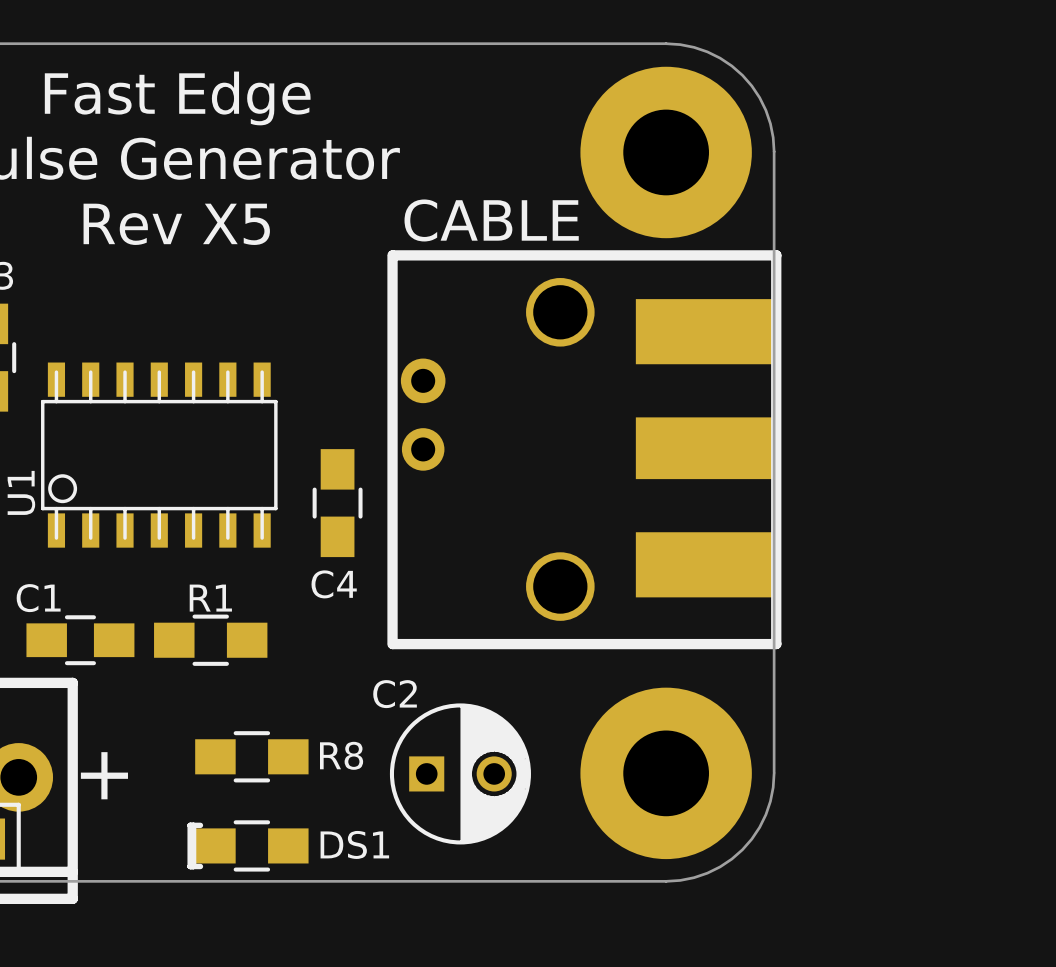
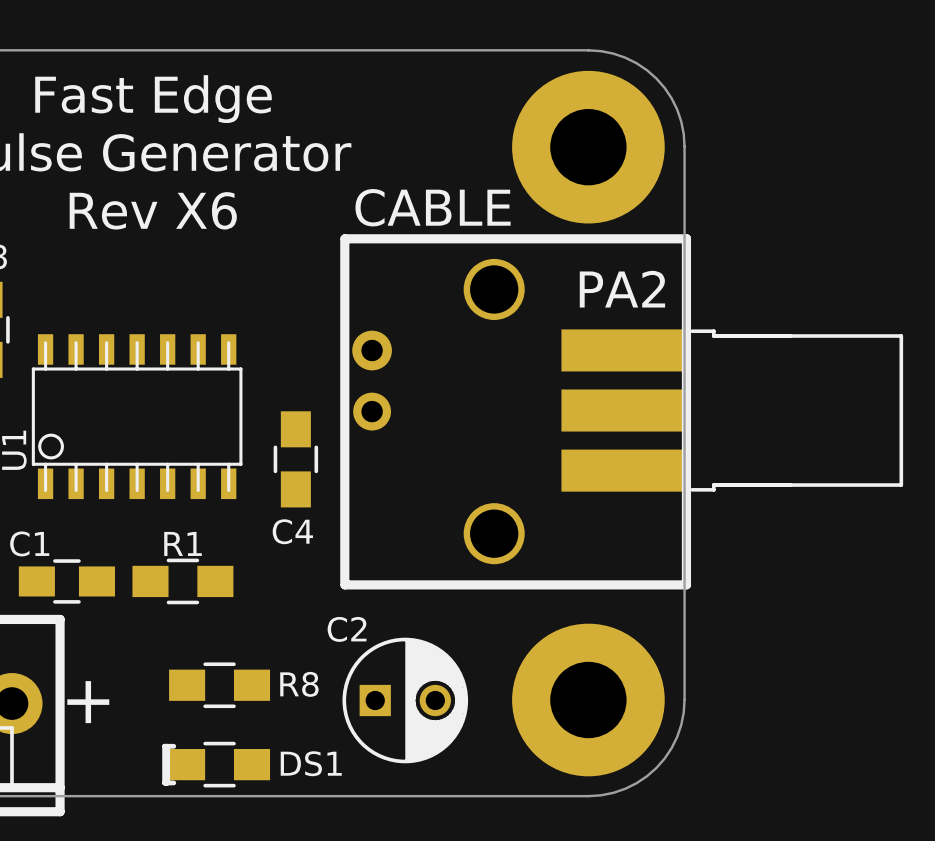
text: Rev X5 (176, 224) -> Rev X6 (153, 210)
part: (704, 448) -> none
PA2: none -> (732, 410)

